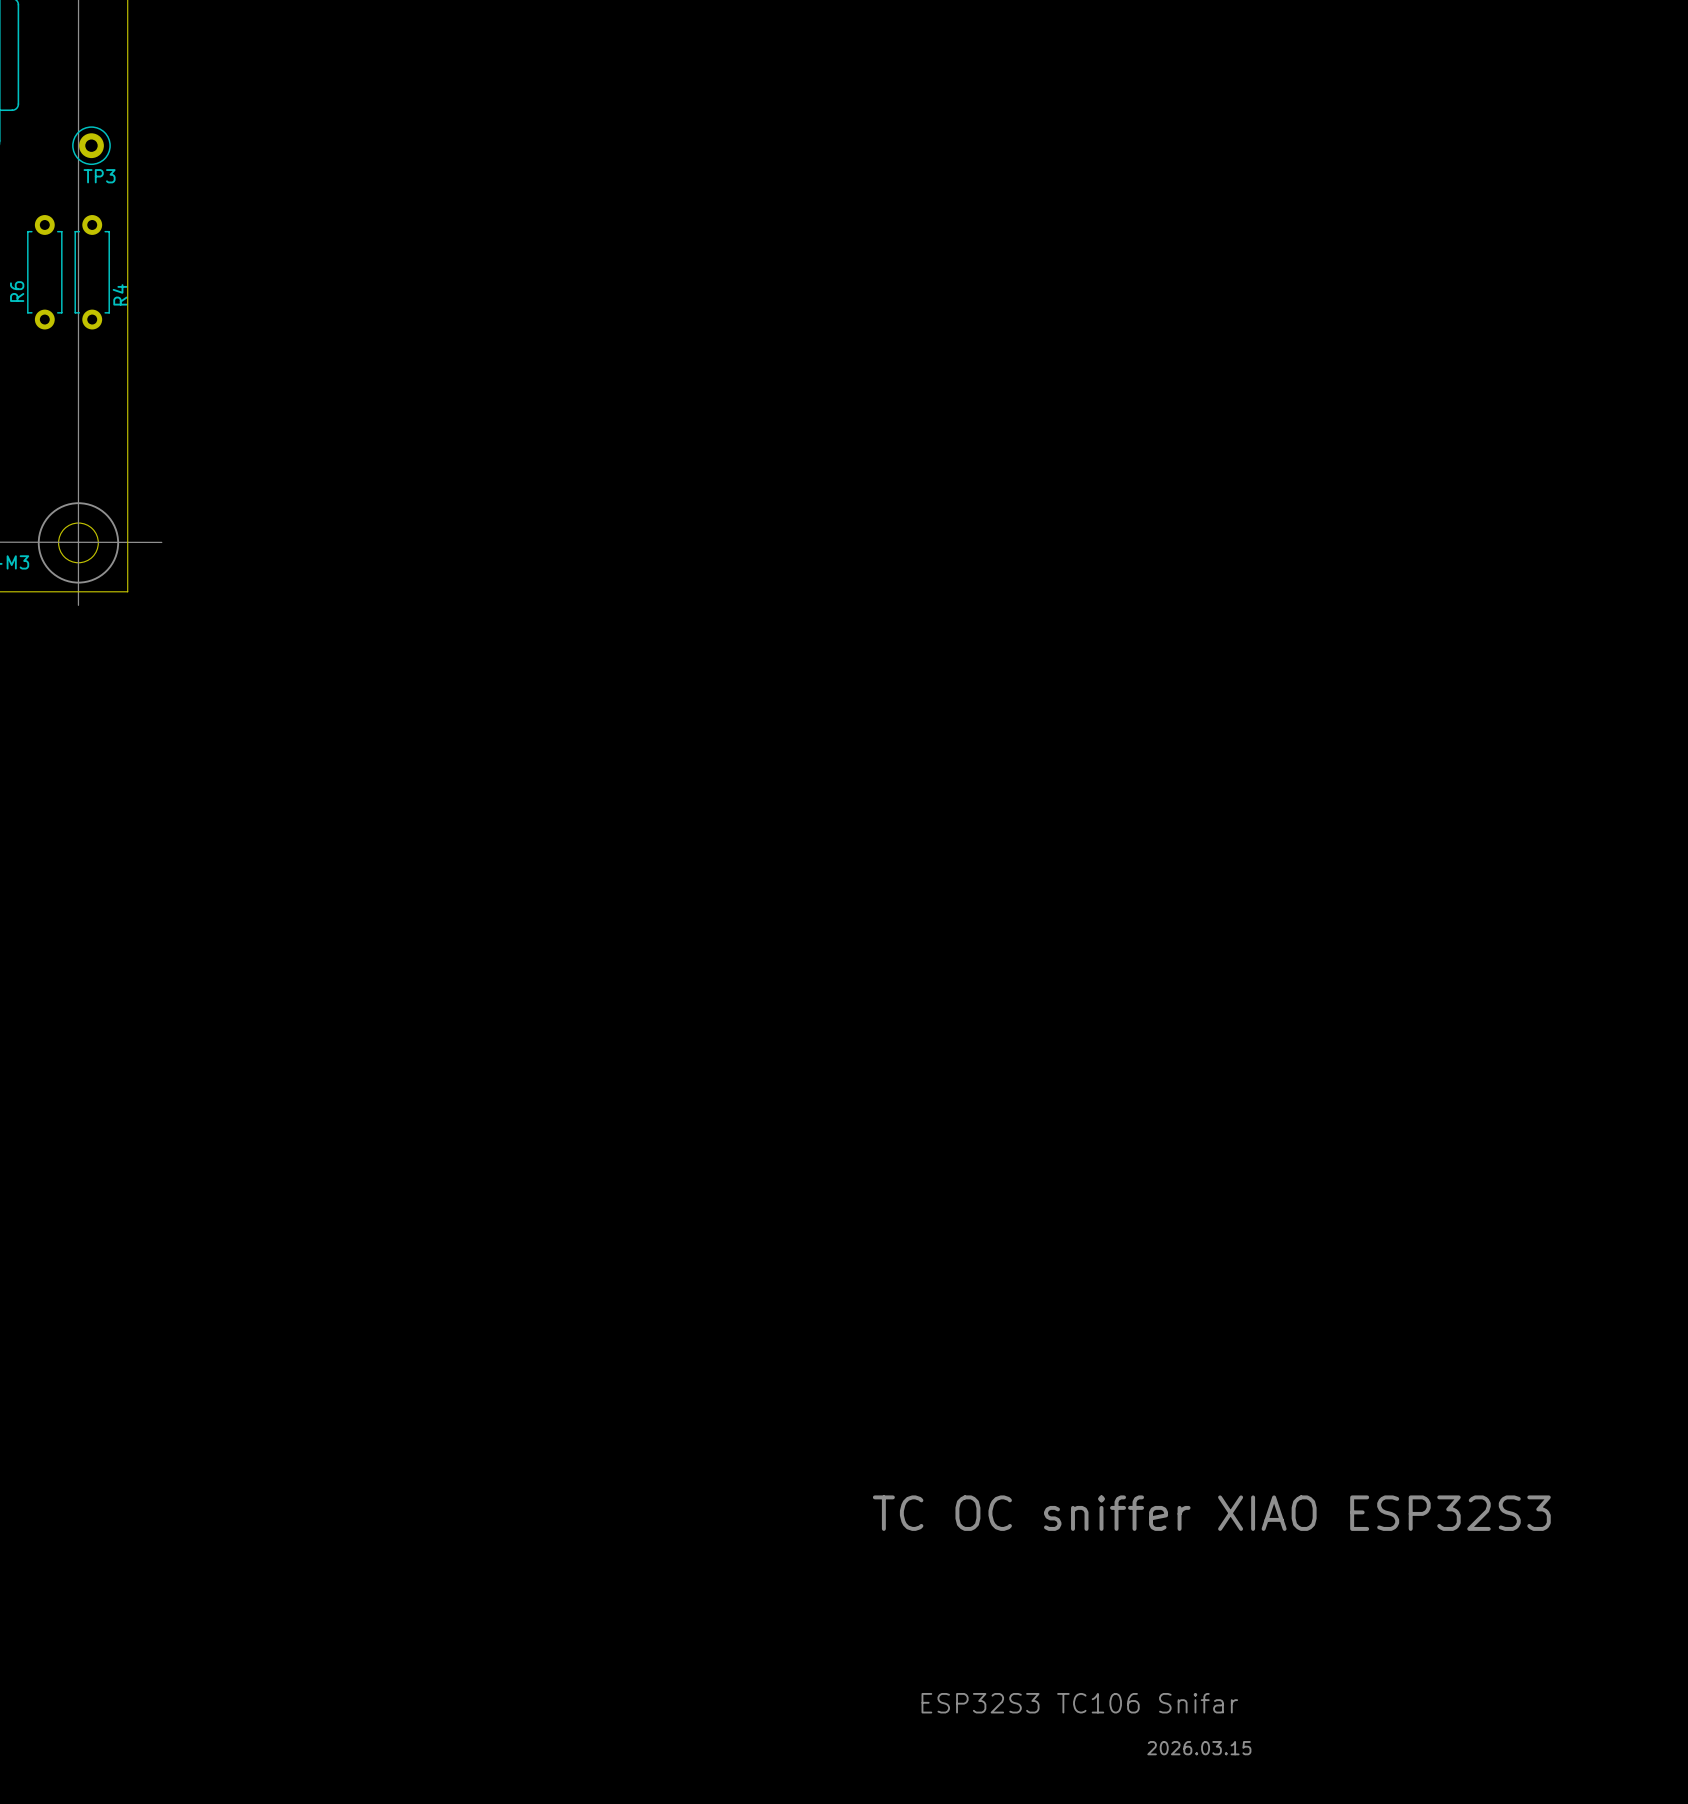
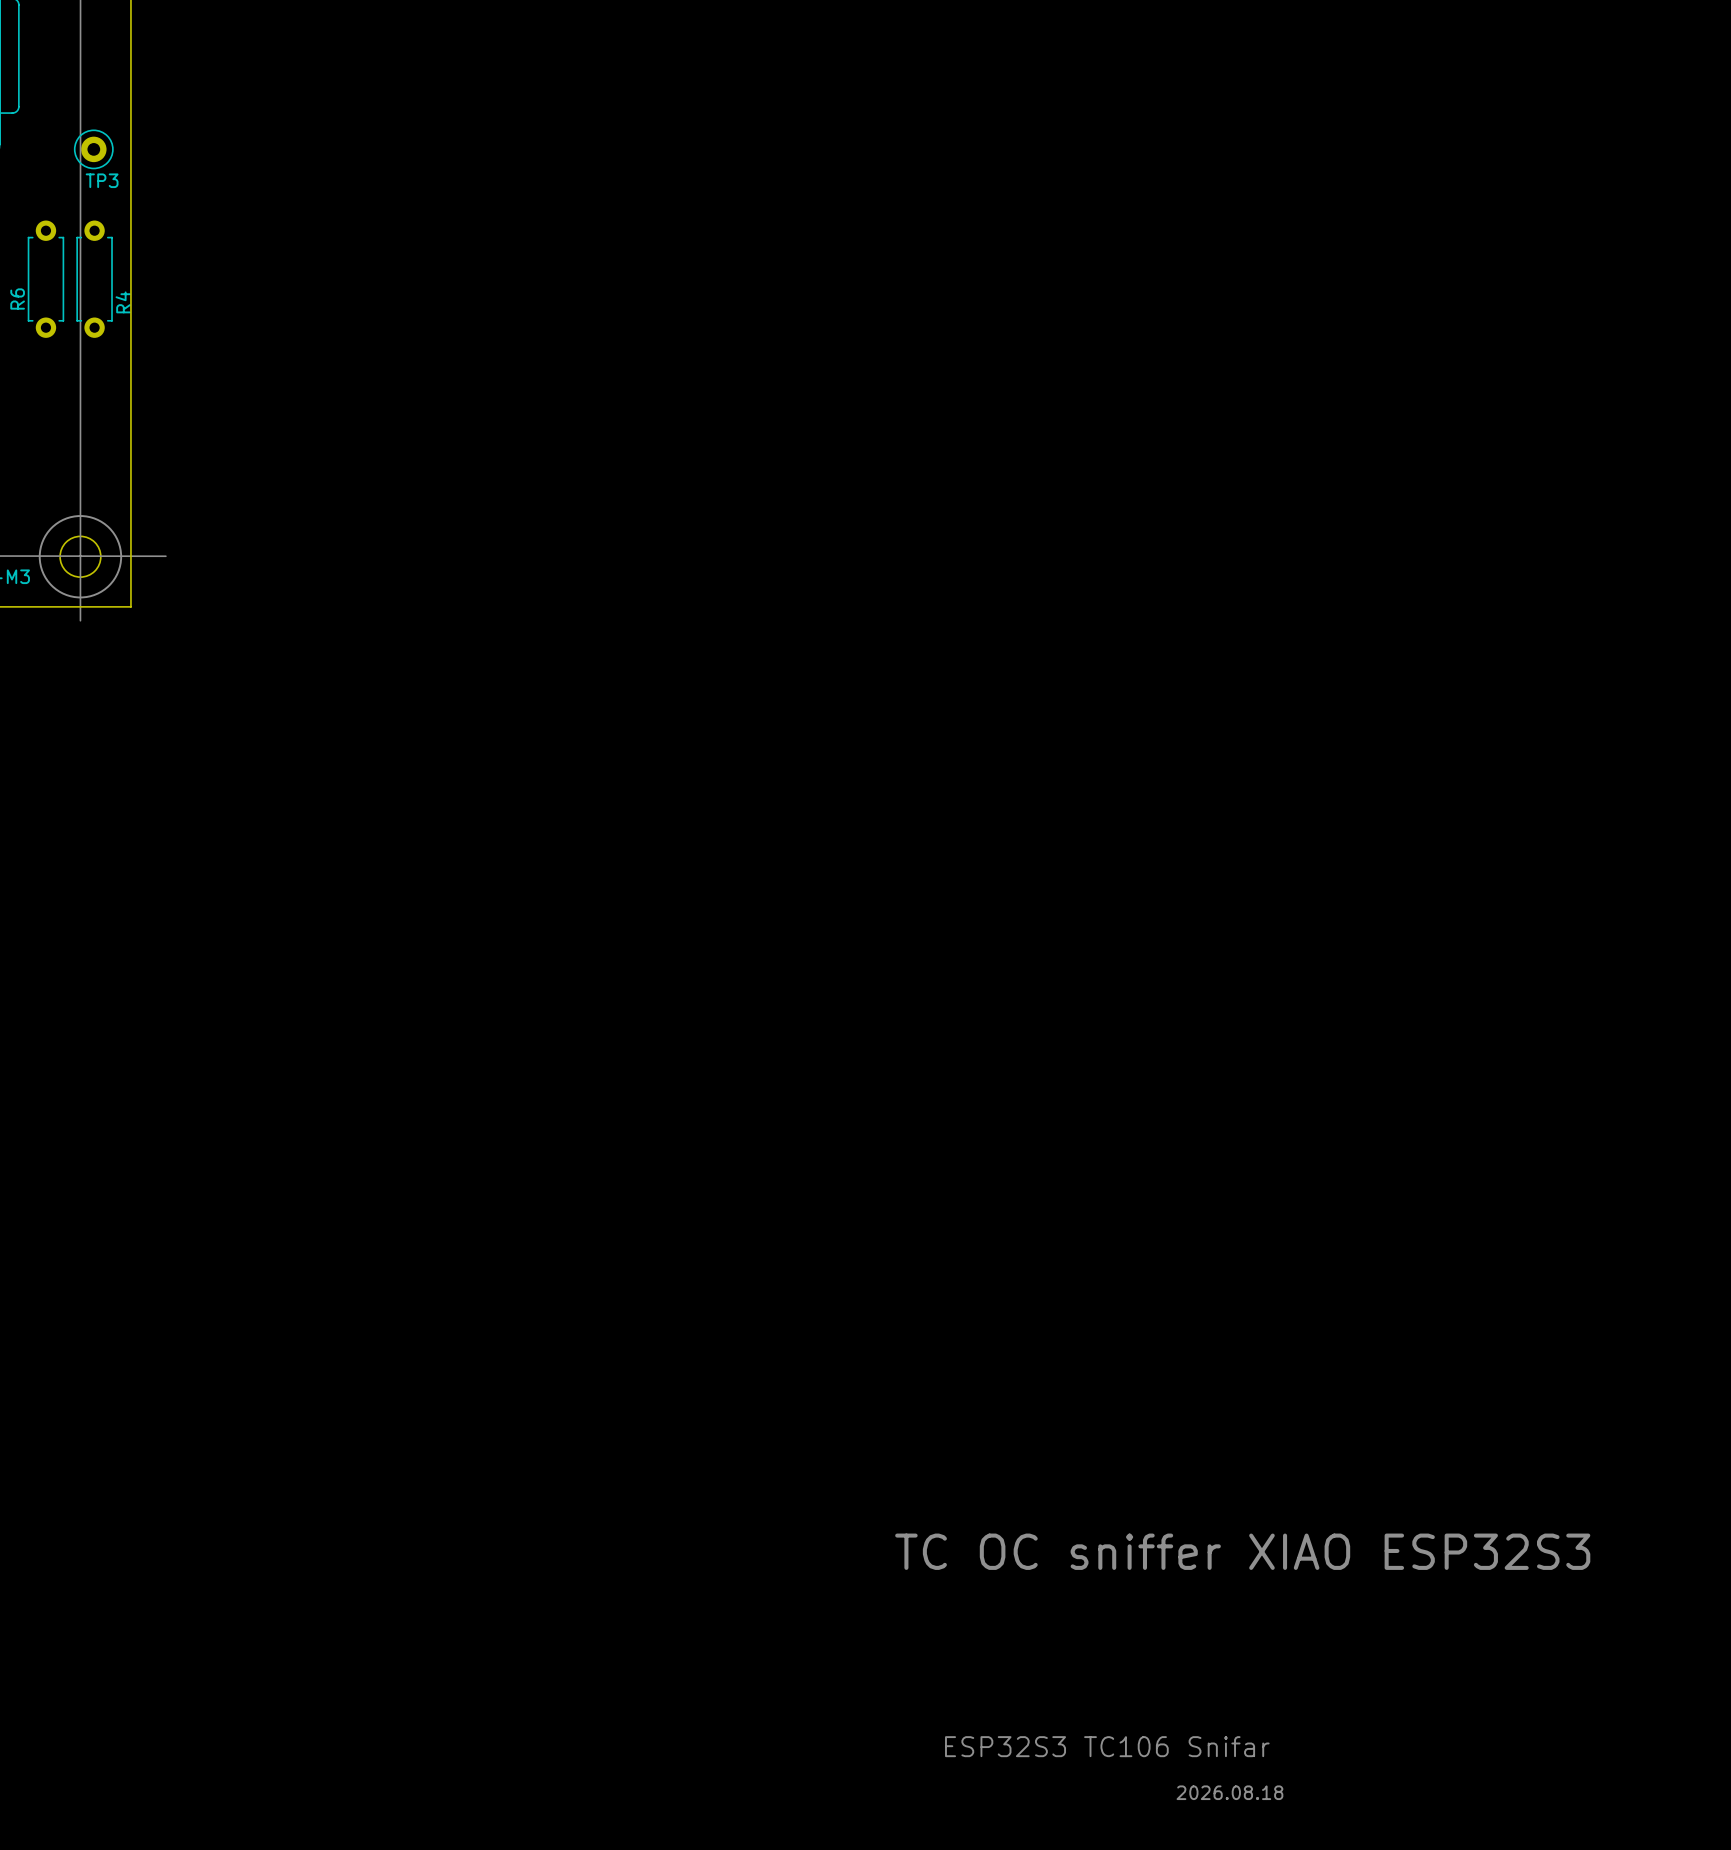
text: 2026.03.15 (1199, 1748) -> 2026.08.18 (1229, 1792)

